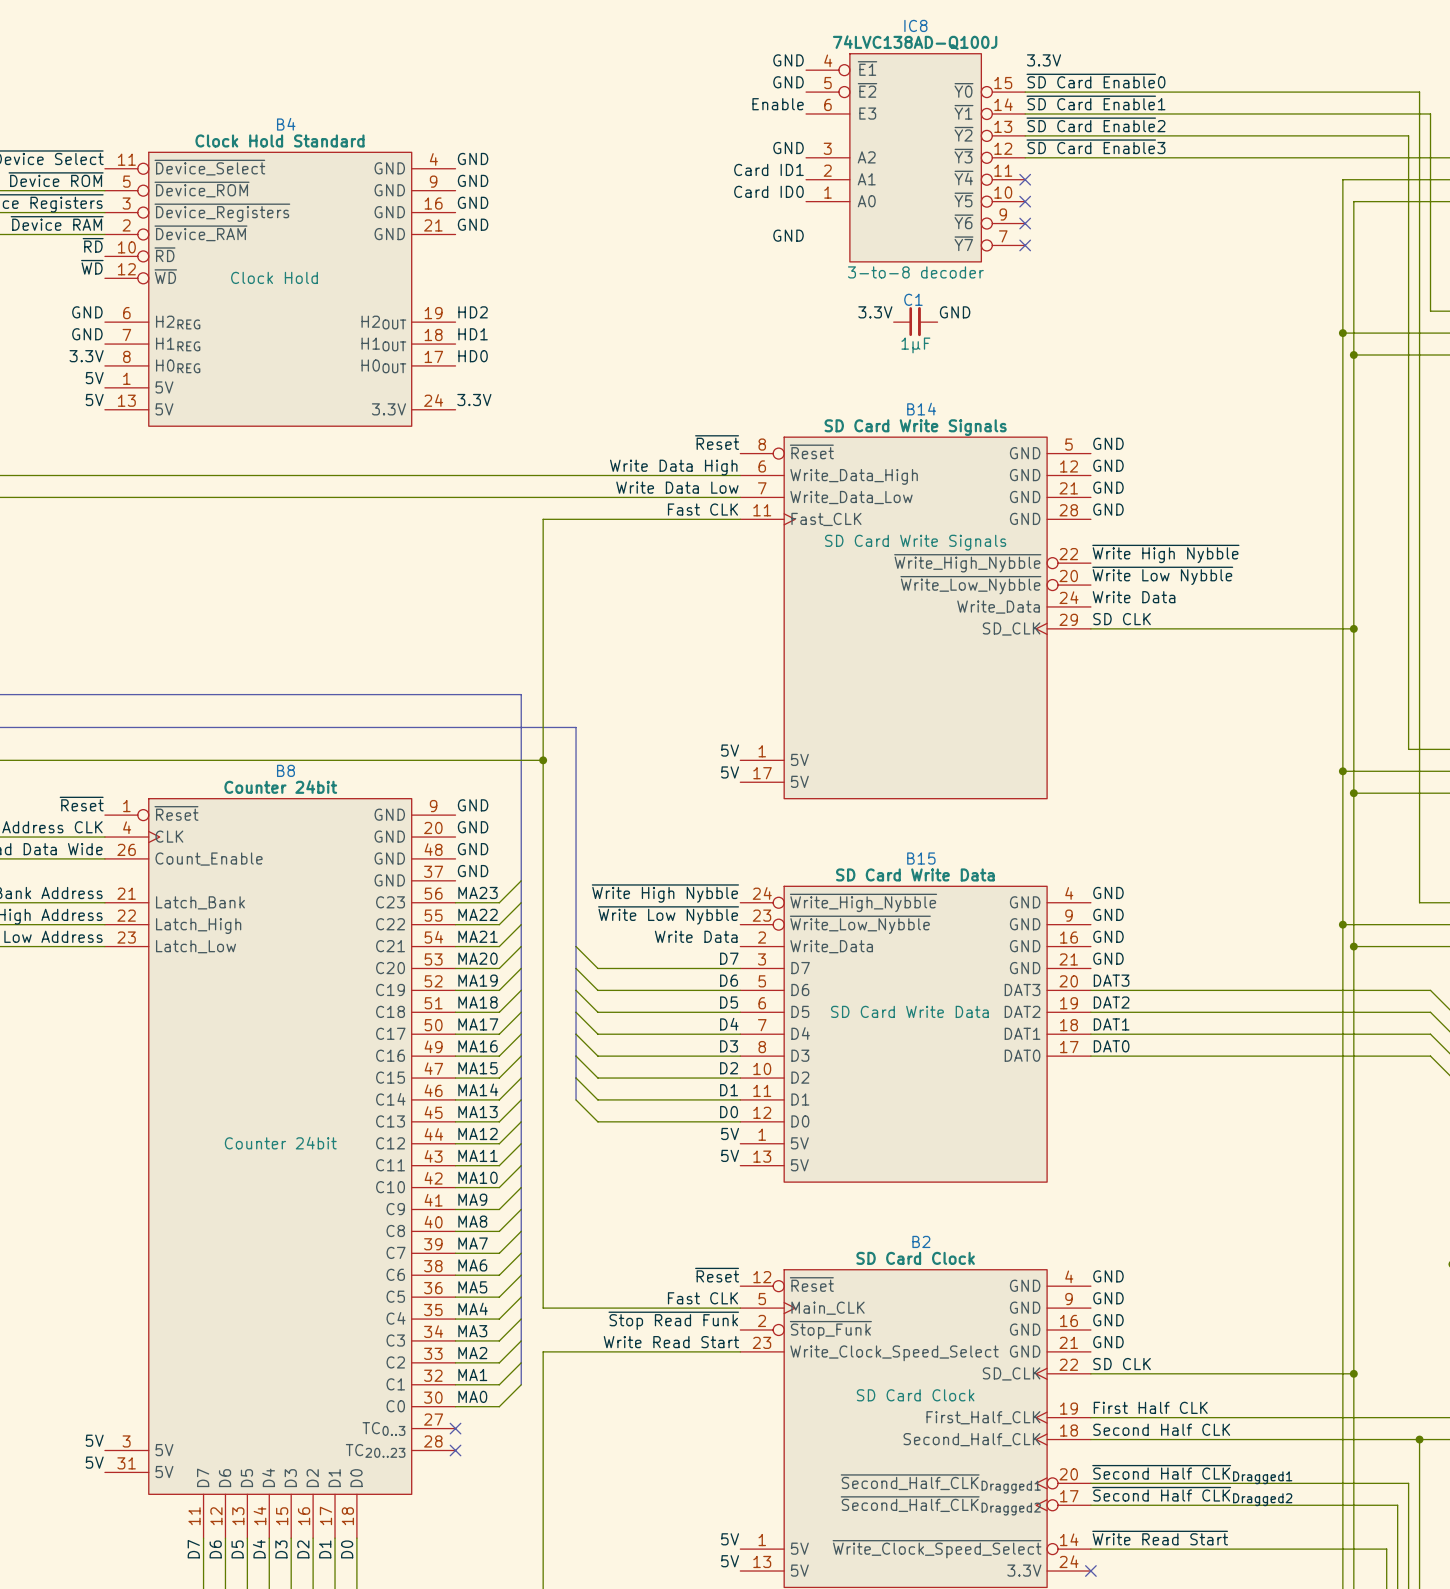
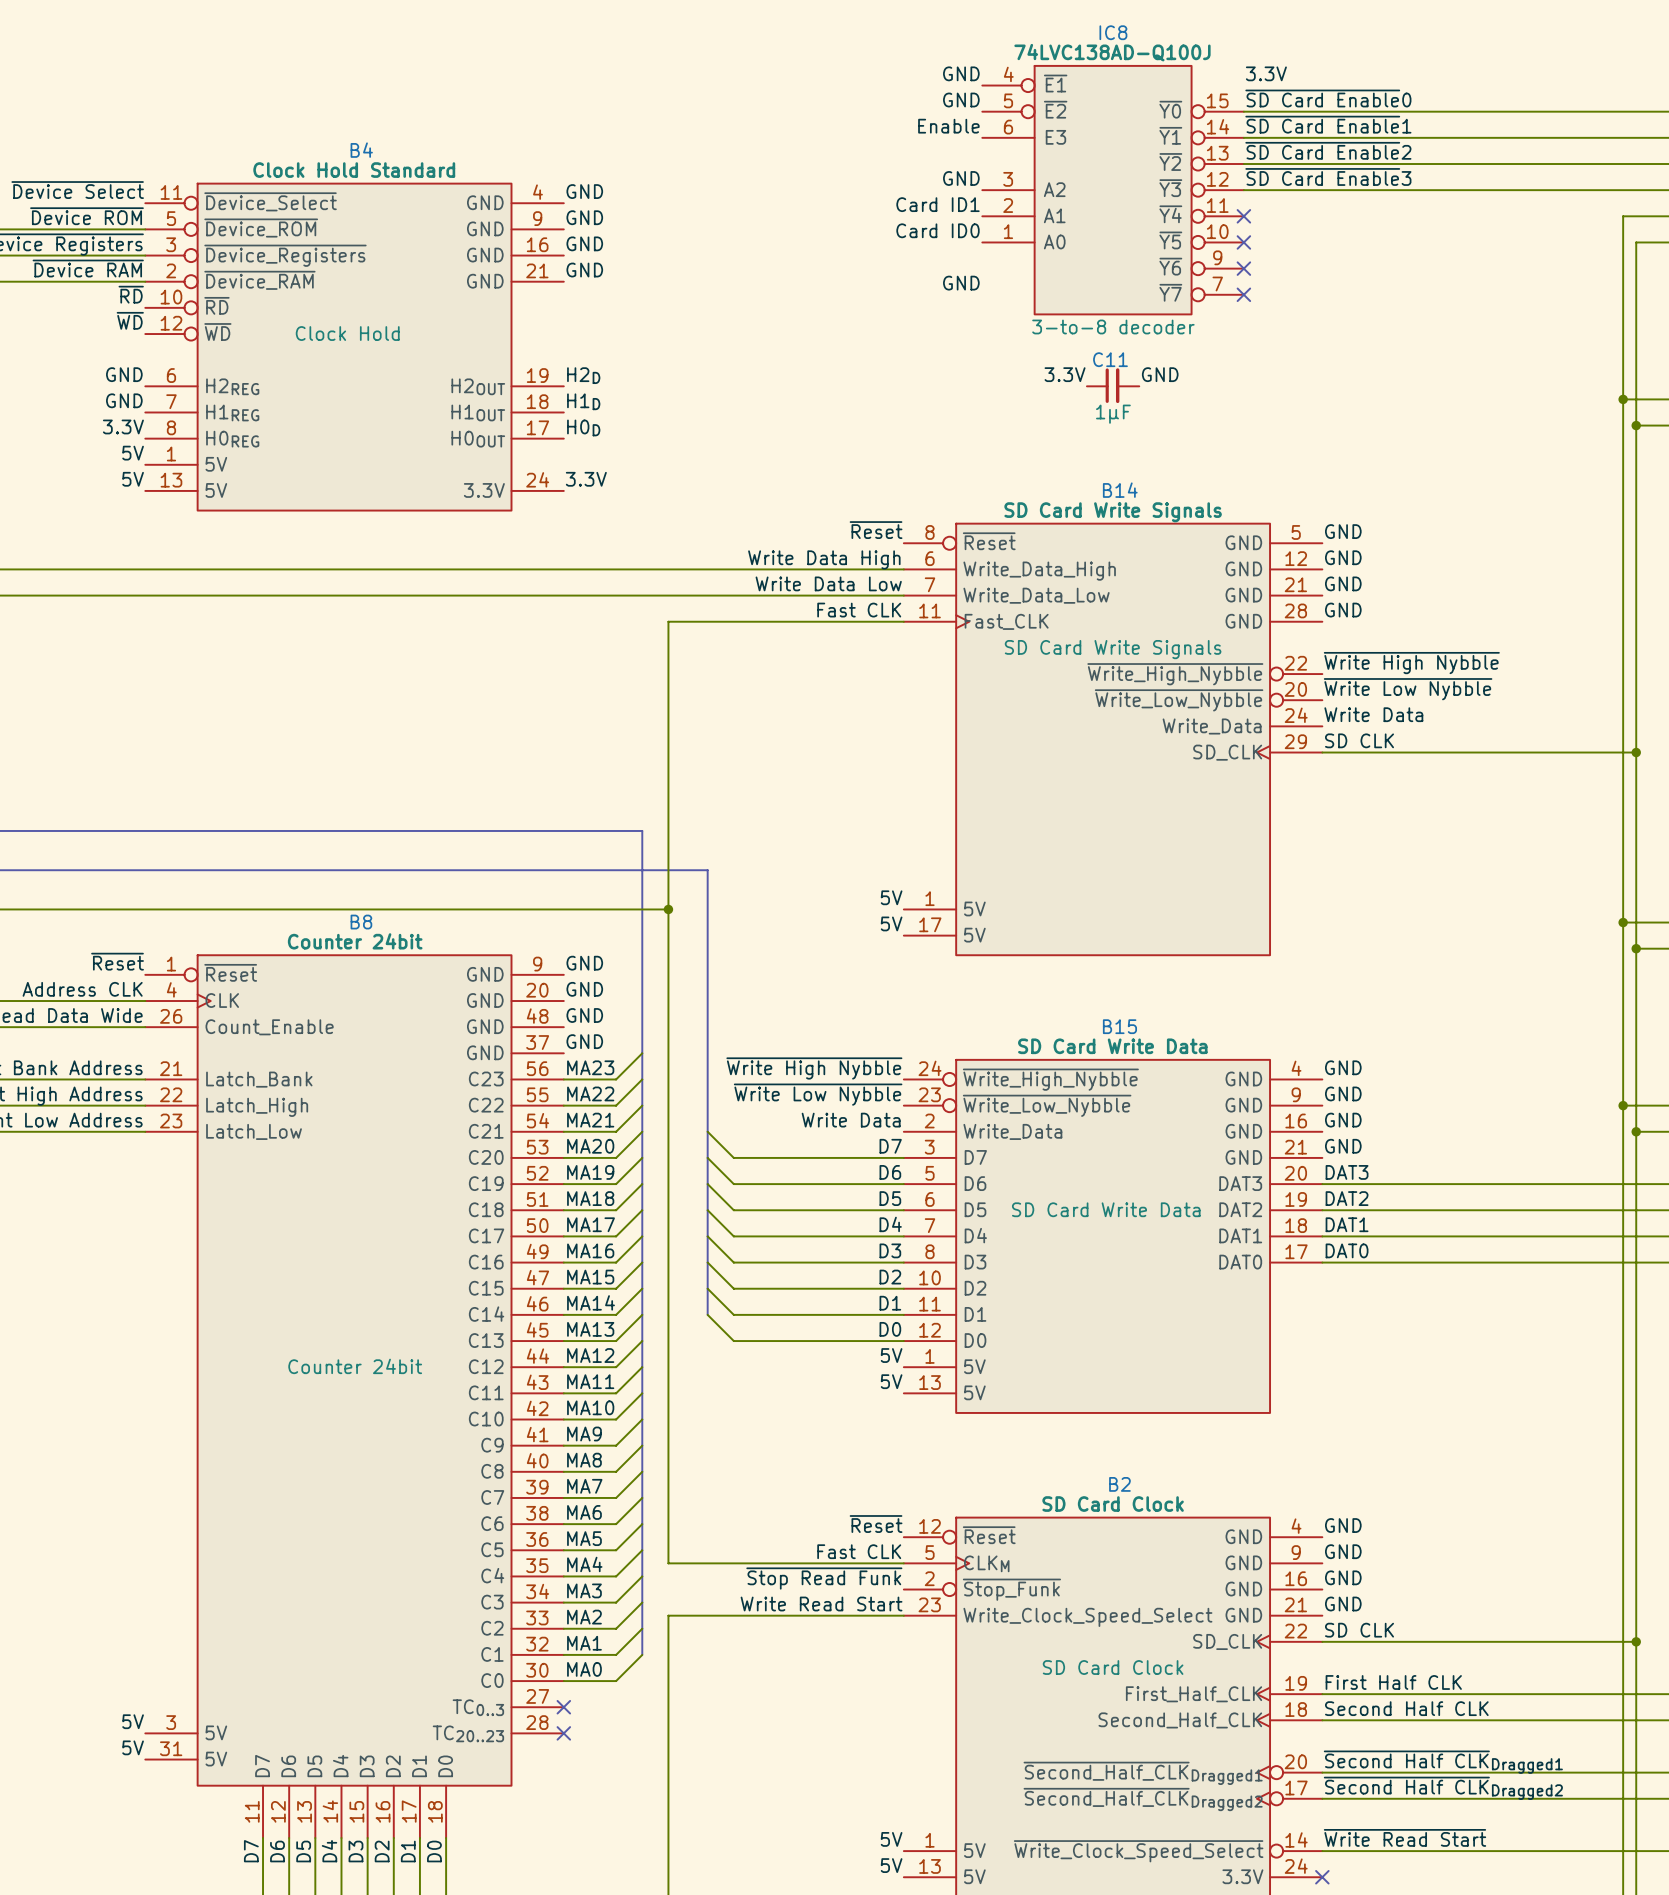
C1 name: C1 (913, 299) -> C11 (1110, 359)
label: HD2 (473, 312) -> H2D (583, 375)
label: HD1 (473, 334) -> H1D (583, 401)
label: HD0 (473, 356) -> H0D (583, 427)
B2 pin name: Main_CLK (828, 1308) -> CLKM (986, 1563)

